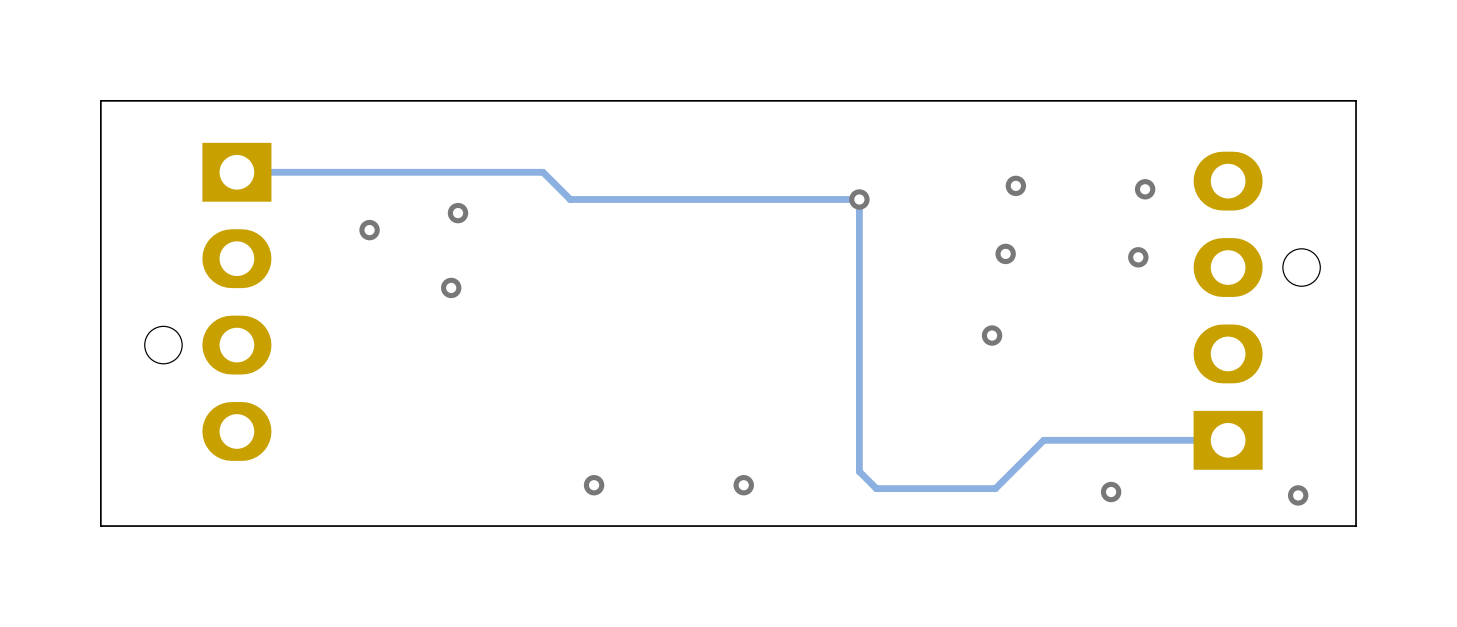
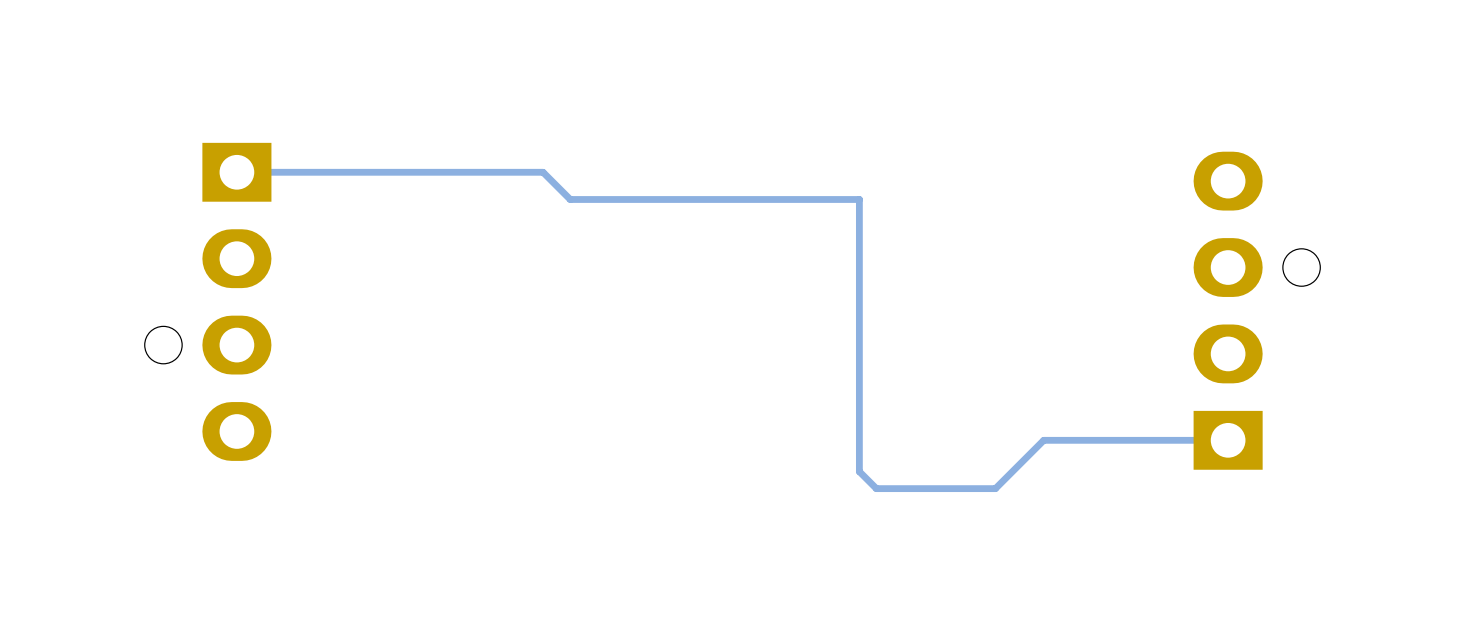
board edge: (1356, 100) (100, 100) (100, 526) (1356, 526) (1356, 100) -> none
via: (1015, 185) -> none
via: (1145, 189) -> none
via: (859, 199) -> none
via: (458, 213) -> none
via: (369, 230) -> none
via: (1005, 253) -> none
via: (1138, 257) -> none
via: (451, 287) -> none
via: (992, 335) -> none
via: (594, 485) -> none
via: (743, 485) -> none
via: (1111, 492) -> none
via: (1298, 495) -> none

